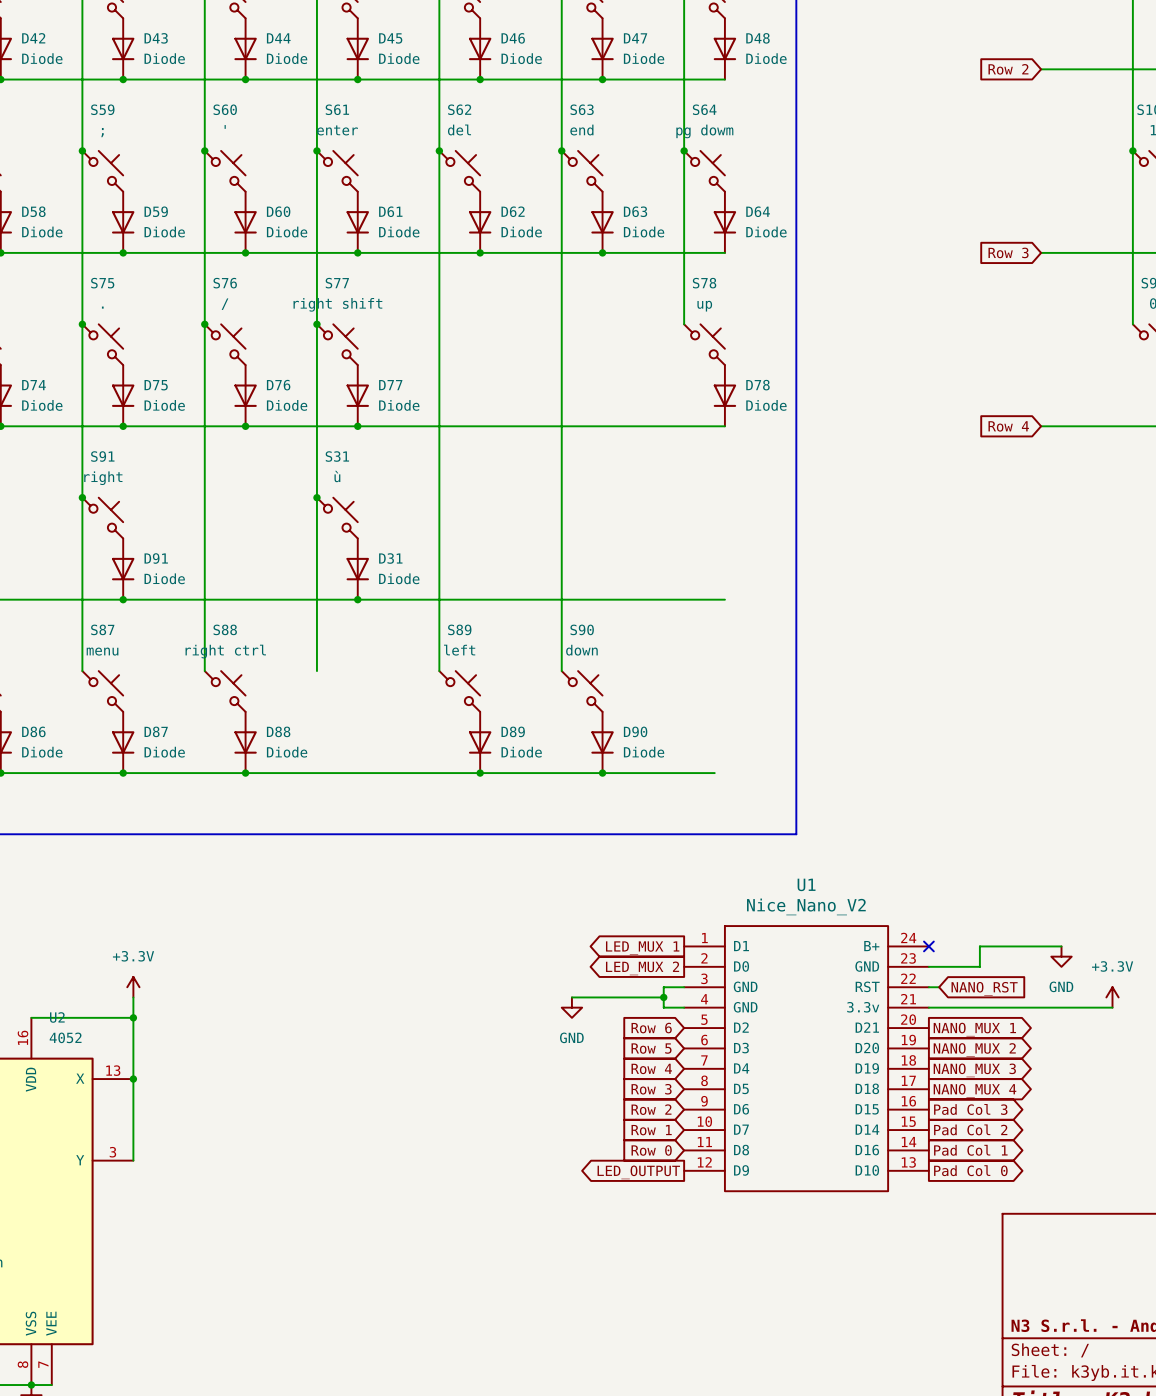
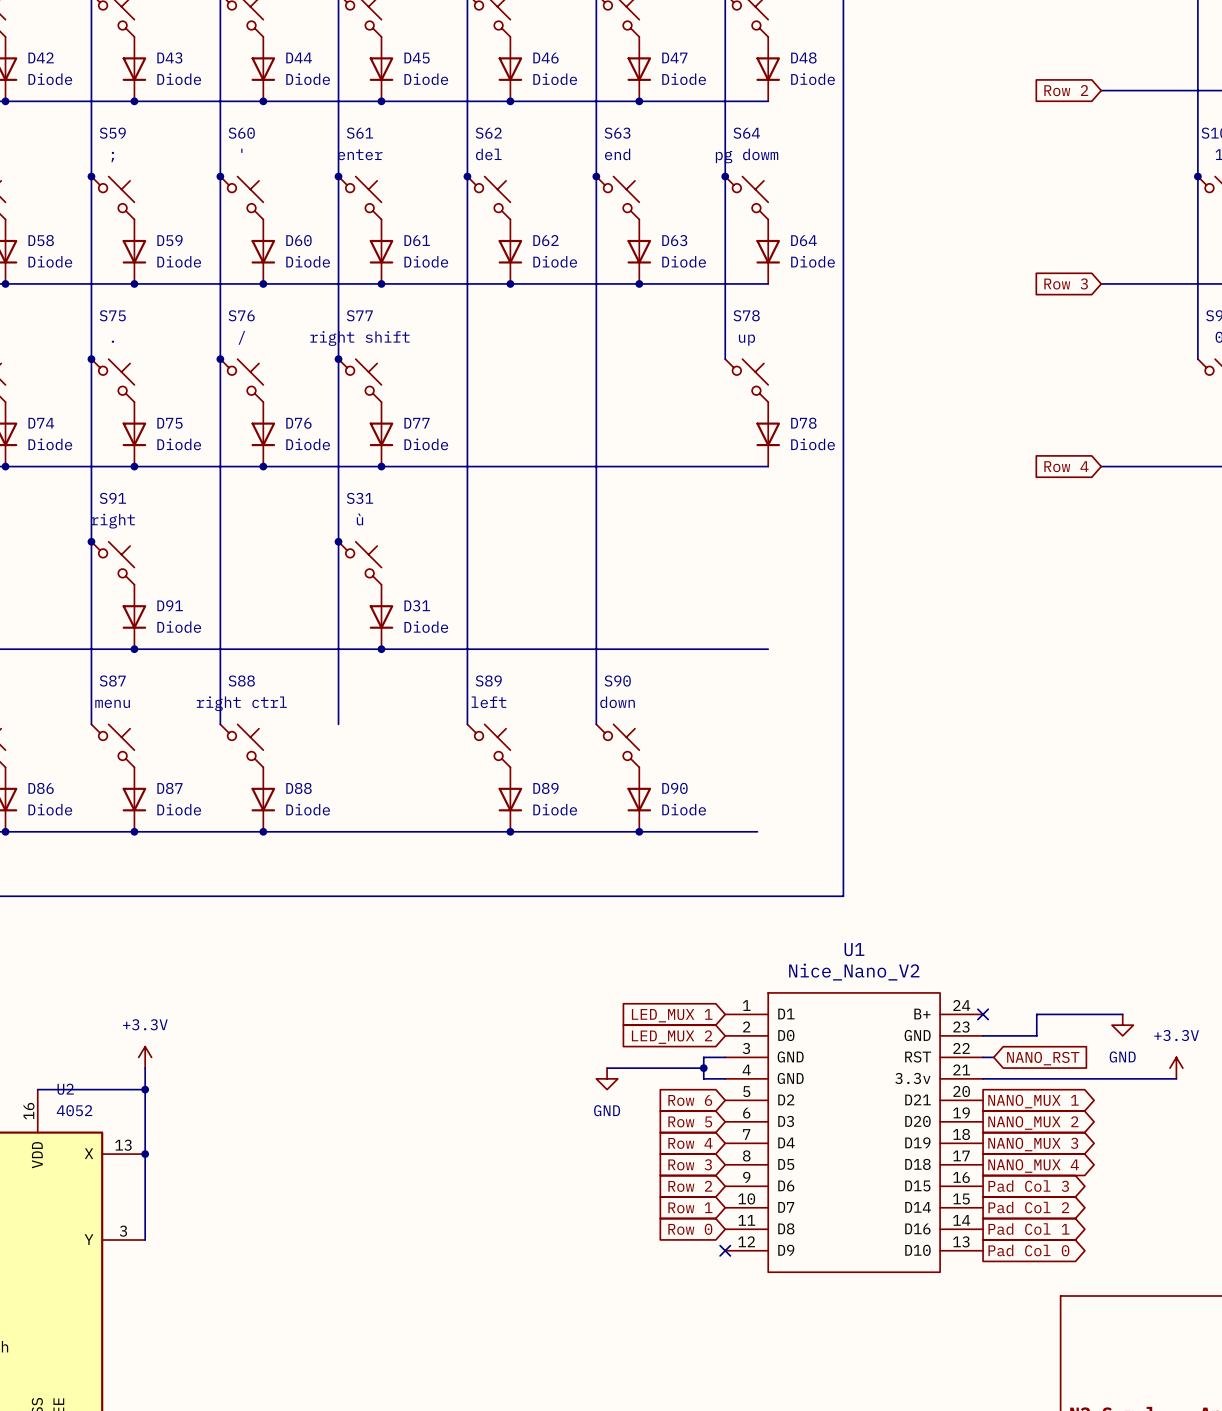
global label shape: output (642, 948) -> input (672, 1015)
global label shape: output (642, 968) -> input (672, 1037)
no-connect mark: none -> (725, 1250)
global label: LED_OUTPUT (638, 1172) -> none

